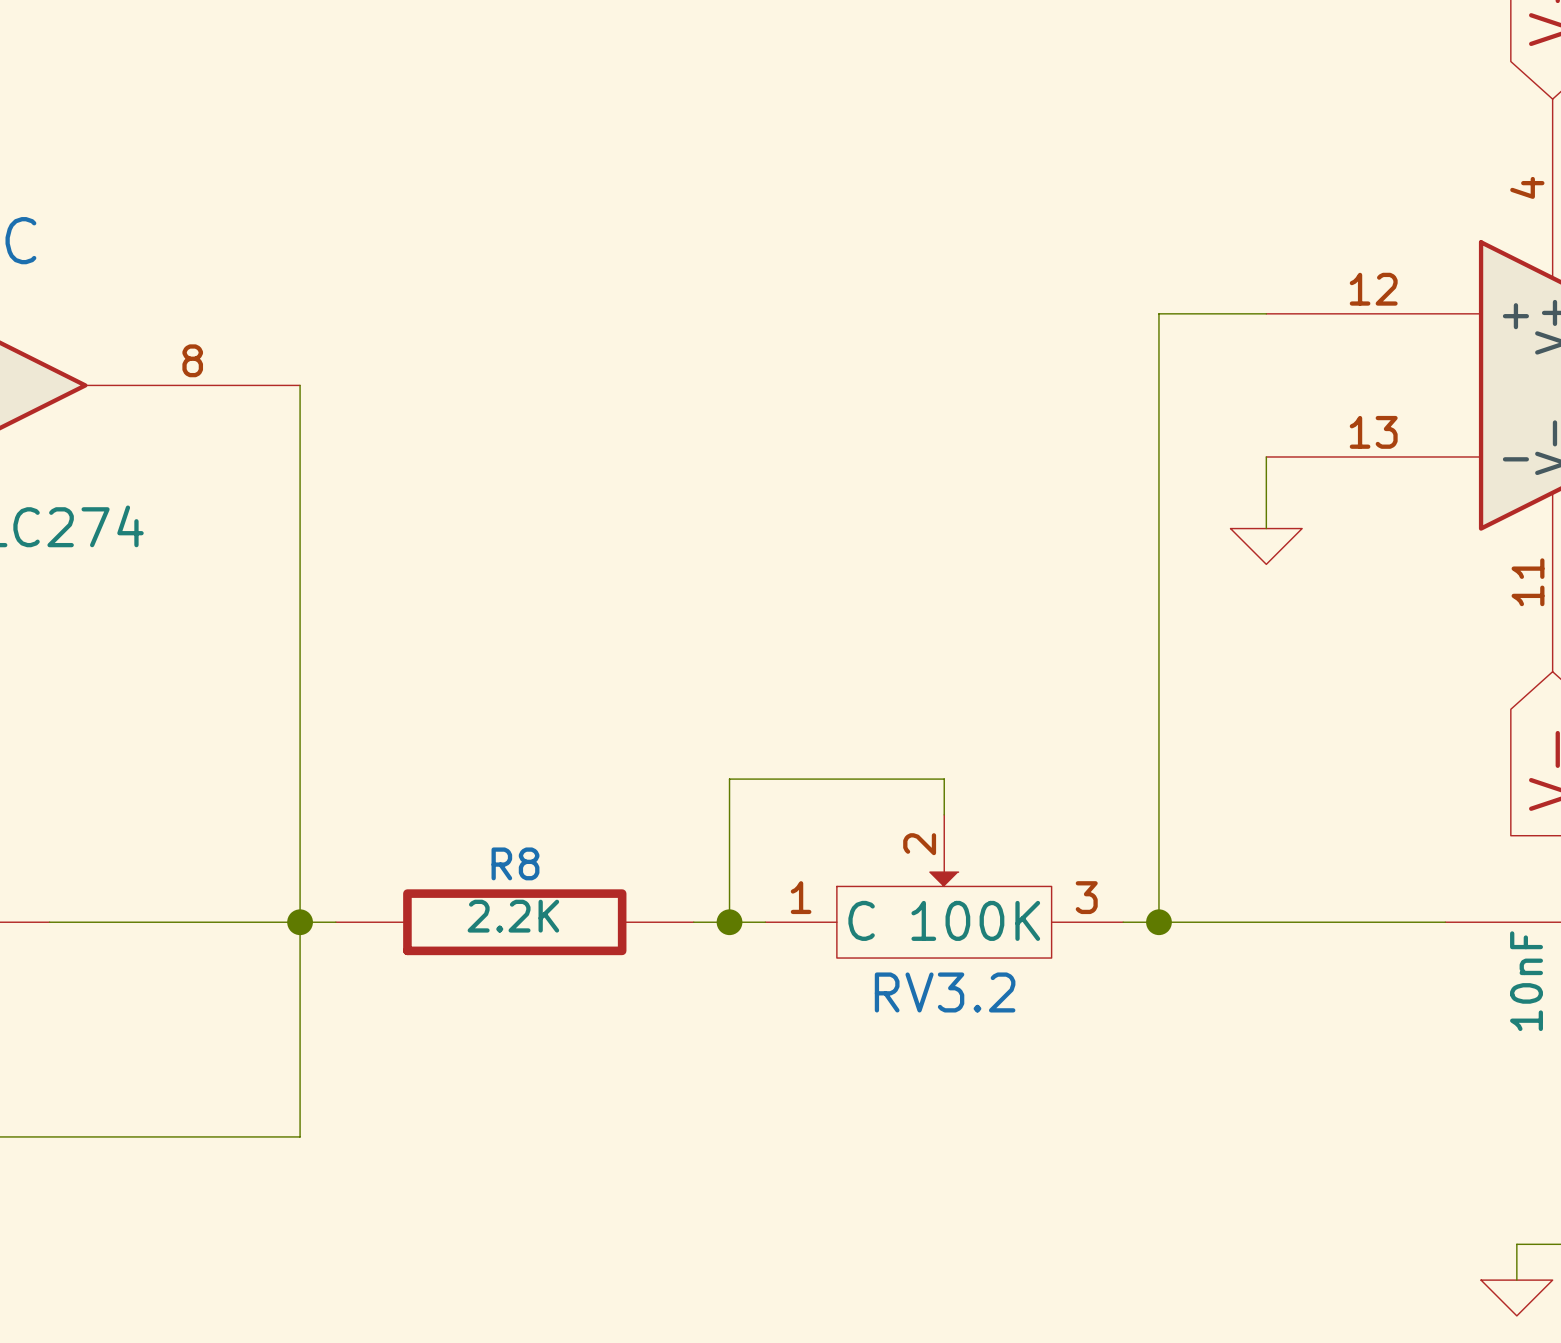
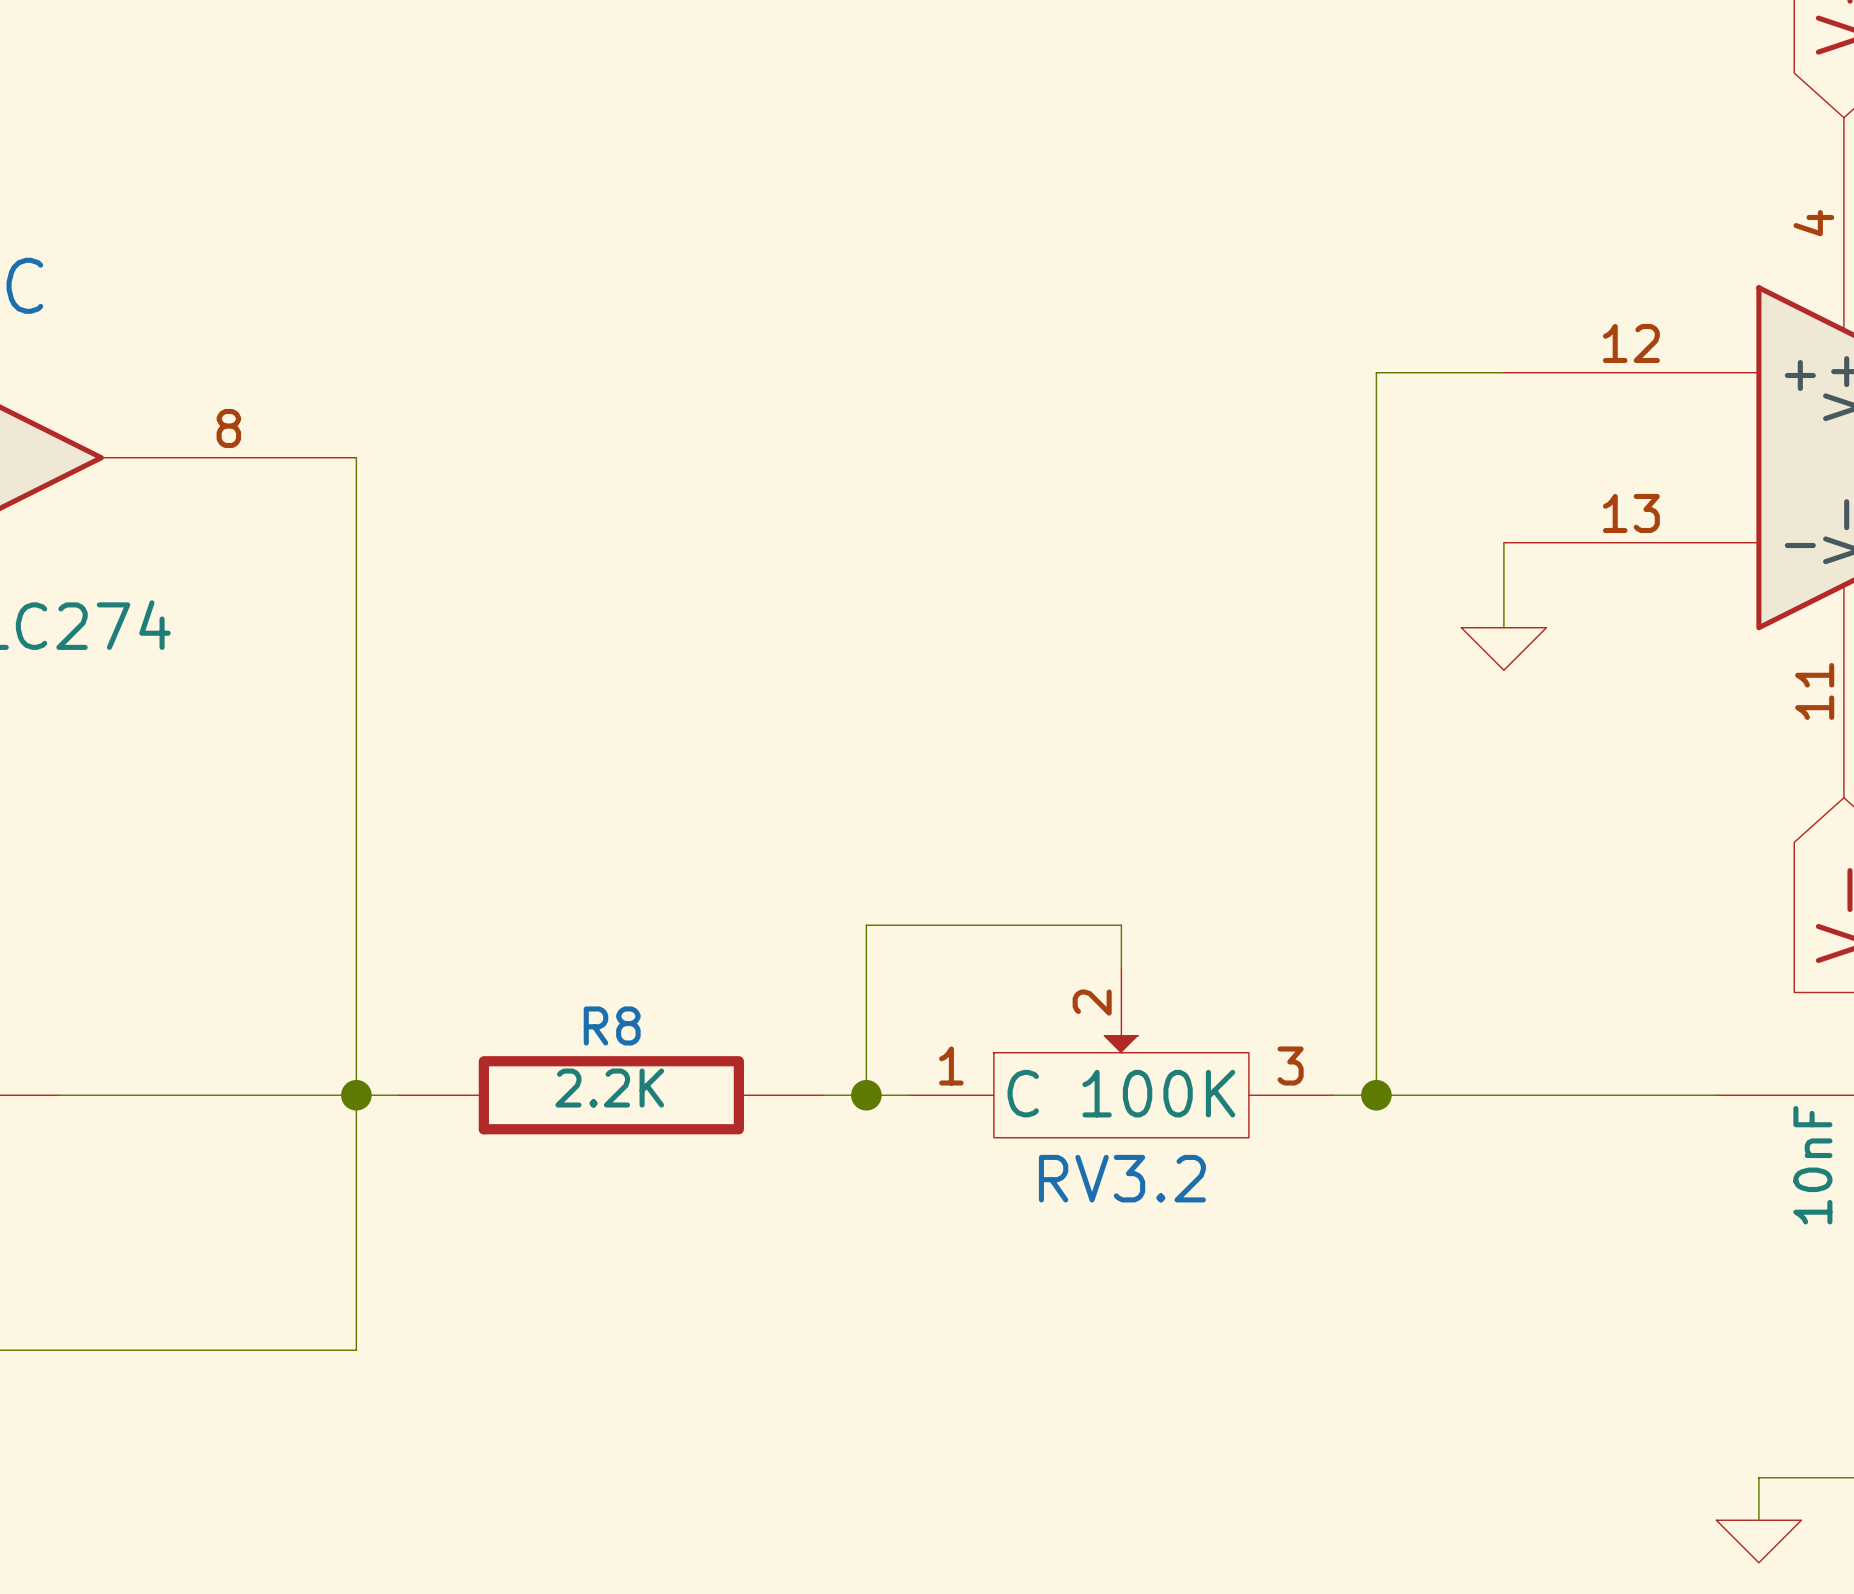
wire: (1516, 1244) (1516, 1280) -> (1801, 1477) (1758, 1477) (1758, 1520)
power symbol position: (1516, 1298) -> (1758, 1541)

